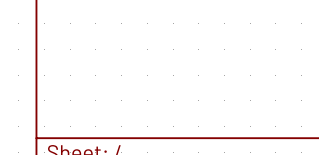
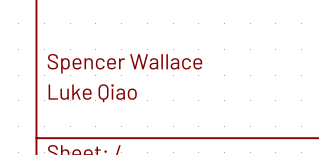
title block: none -> Spencer Wallace (124, 63)
title block: none -> Luke Qiao (92, 93)

